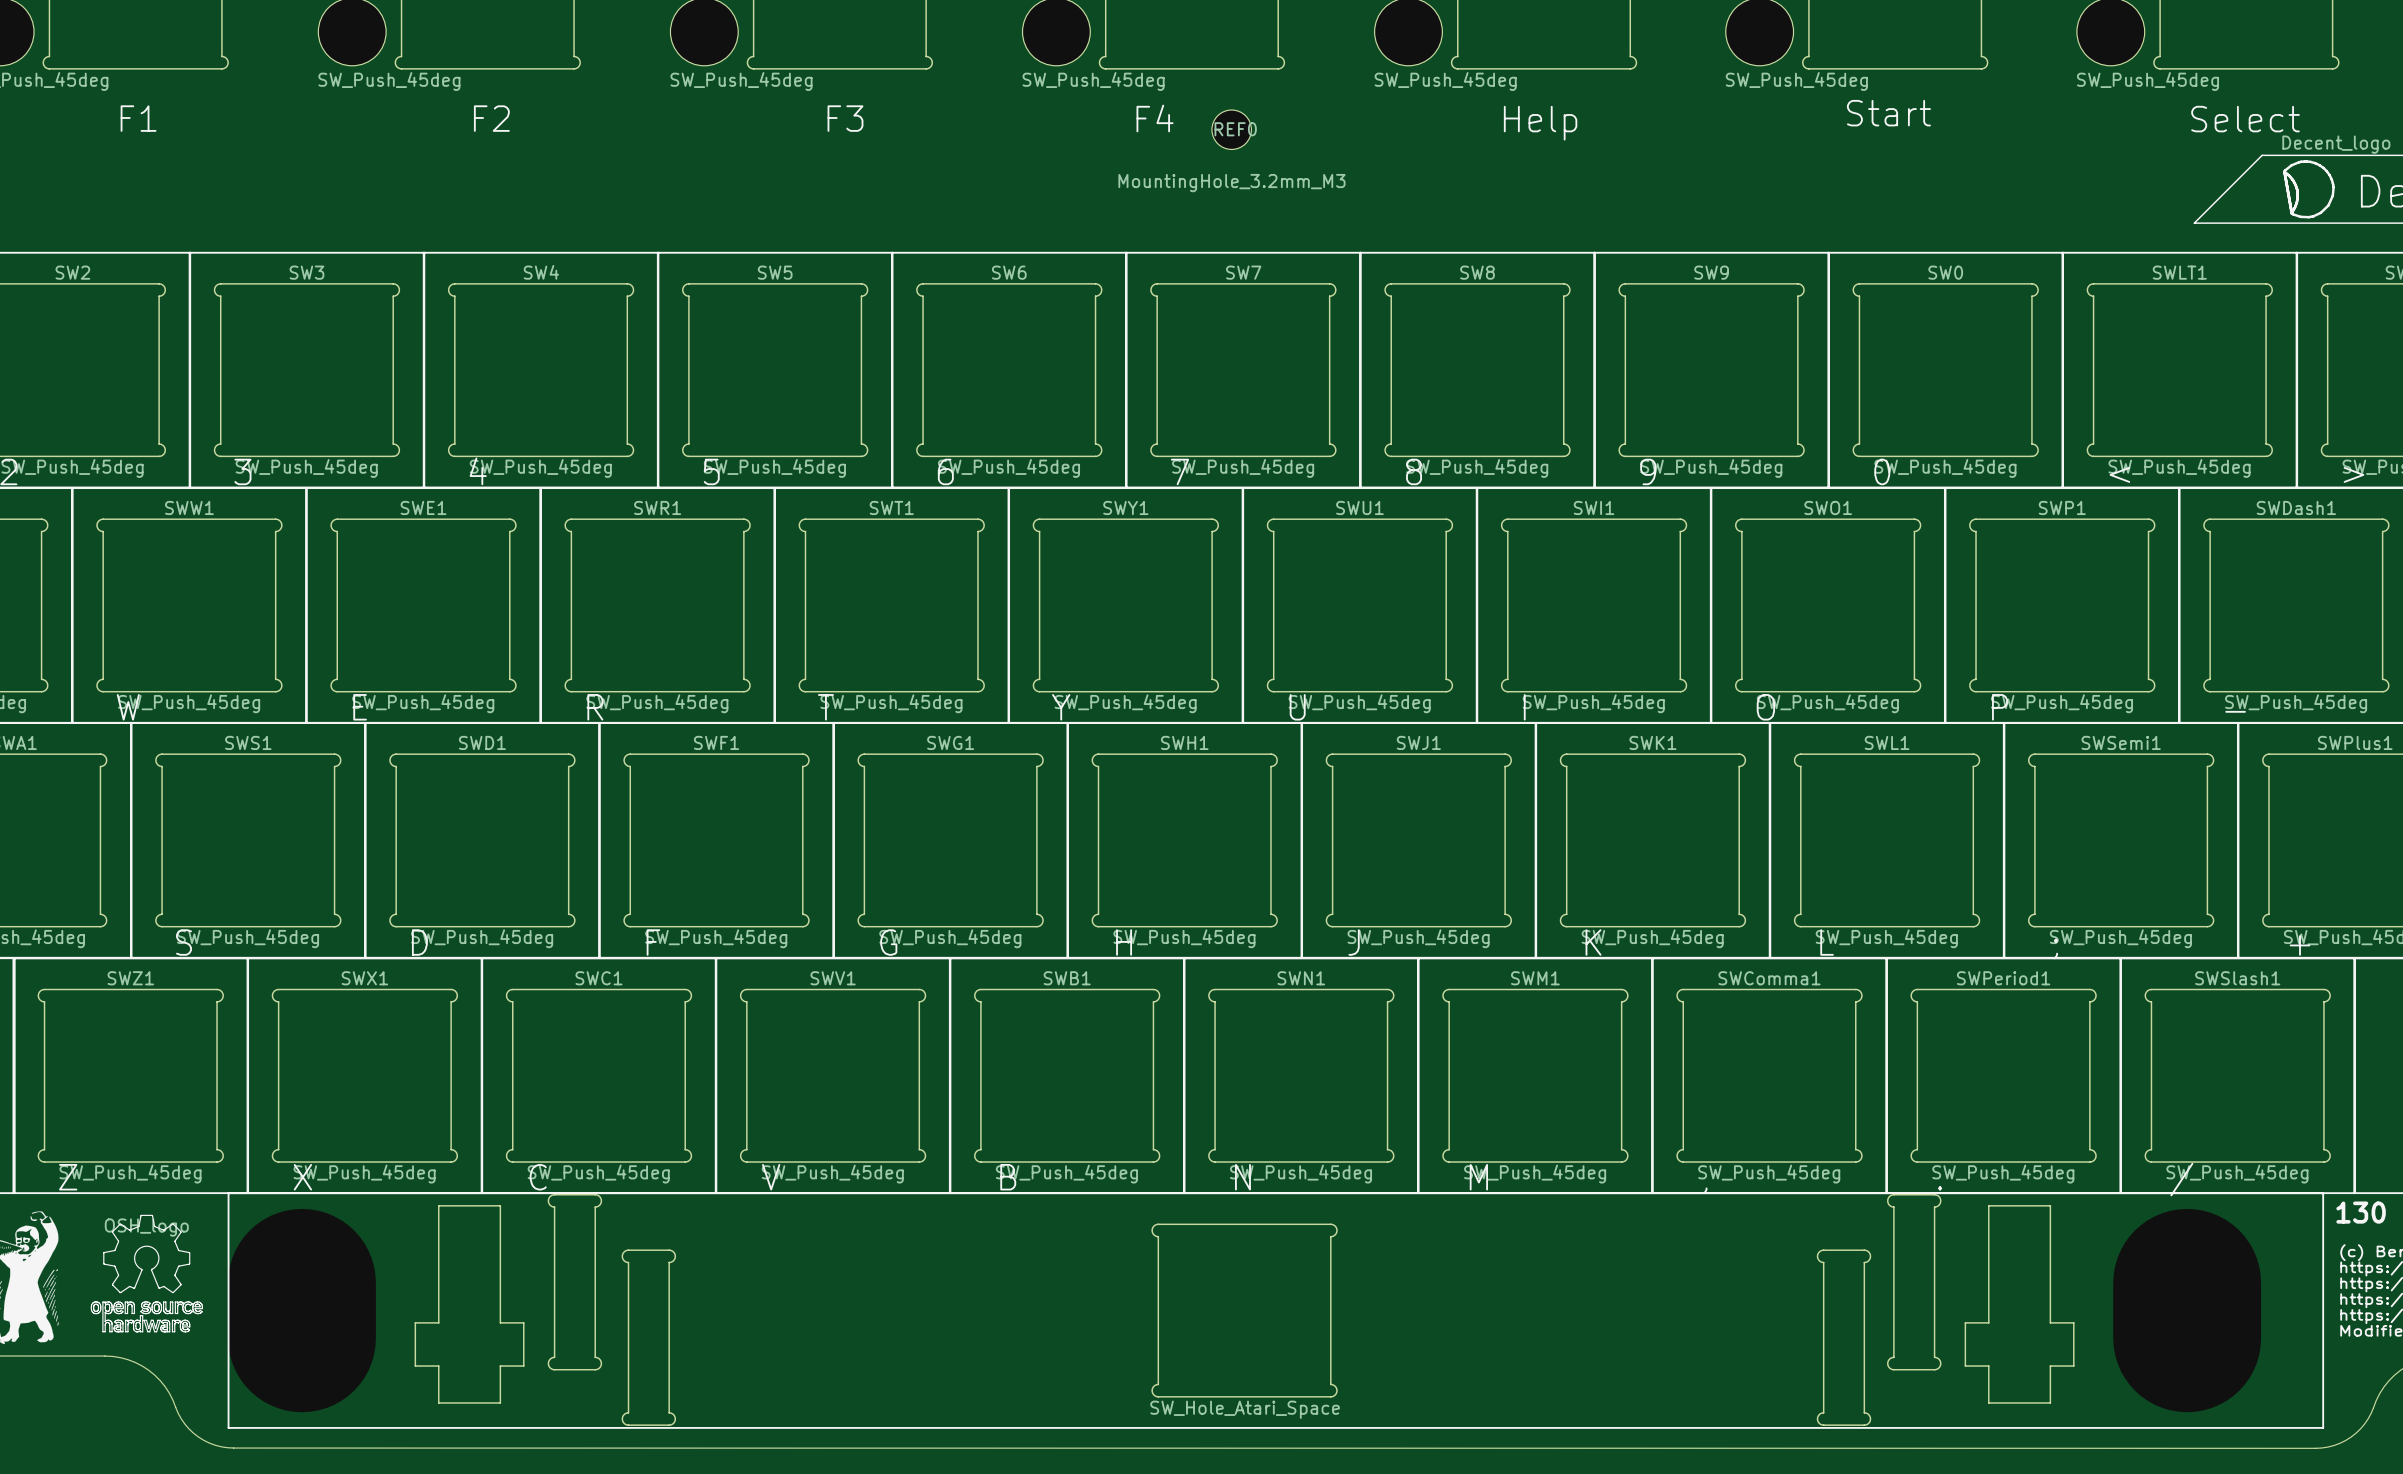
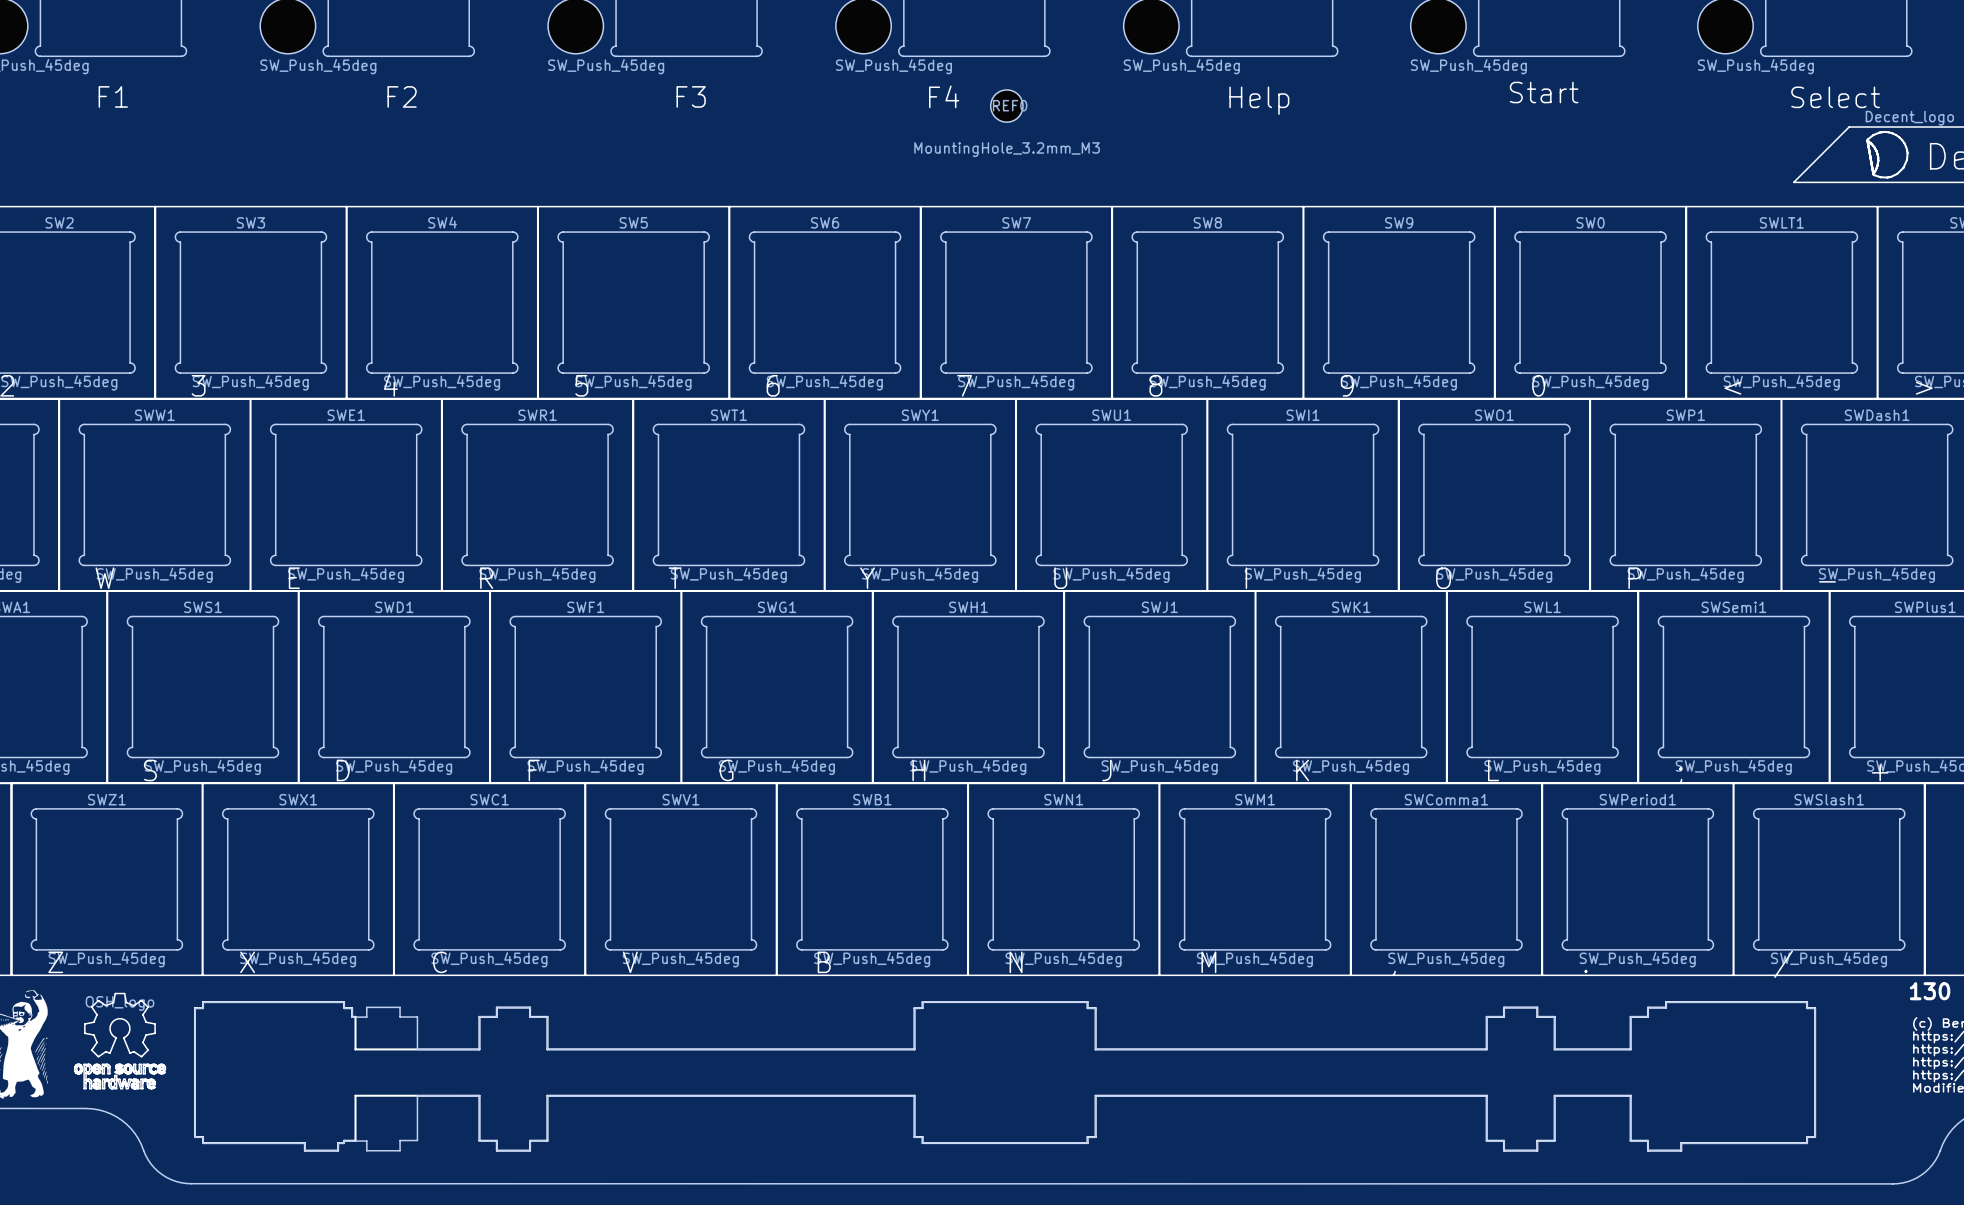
line: none -> (203, 1002) (344, 1002) (344, 1008) (352, 1008) (352, 1016) (355, 1016) (355, 1049) (479, 1049) (479, 1016) (496, 1016) (496, 1007) (530, 1007) (530, 1016) (547, 1016) (547, 1049) (914, 1049) (914, 1008) (922, 1008) (922, 1002) (1087, 1002) (1087, 1008) (1095, 1008) (1095, 1049) (1486, 1049) (1486, 1016) (1504, 1016) (1504, 1007) (1537, 1007) (1537, 1016) (1554, 1016) (1554, 1049) (1630, 1049) (1630, 1016) (1648, 1016) (1648, 1007) (1666, 1007) (1666, 1002) (1807, 1002) (1807, 1008) (1815, 1008) (1815, 1137) (1807, 1137) (1807, 1143) (1681, 1143) (1681, 1150) (1648, 1150) (1648, 1140) (1630, 1140) (1630, 1095) (1554, 1095) (1554, 1140) (1537, 1140) (1537, 1150) (1504, 1150) (1504, 1140) (1486, 1140) (1486, 1095) (1095, 1095) (1095, 1137) (1087, 1137) (1087, 1143) (922, 1143) (922, 1137) (914, 1137) (914, 1095) (547, 1095) (547, 1140) (530, 1140) (530, 1150) (496, 1150) (496, 1140) (479, 1140) (479, 1095) (355, 1095) (355, 1140) (344, 1140) (344, 1143) (338, 1143) (338, 1150) (304, 1150) (304, 1143) (203, 1143) (203, 1137) (194, 1137) (194, 1008) (203, 1008) (203, 1002)
board edge: none -> (366, 1007) (366, 1017) (352, 1017) (352, 1008) (344, 1008) (344, 1002) (203, 1002) (203, 1008) (195, 1008) (195, 1137) (203, 1137) (203, 1143) (304, 1143) (304, 1150) (338, 1150) (338, 1143) (344, 1143) (344, 1141) (366, 1141) (366, 1150) (400, 1150) (400, 1140) (417, 1140) (417, 1095) (479, 1095) (479, 1141) (496, 1141) (496, 1150) (530, 1150) (530, 1140) (547, 1140) (547, 1096) (914, 1096) (914, 1137) (922, 1137) (922, 1142) (1087, 1142) (1087, 1137) (1095, 1137) (1095, 1096) (1486, 1096) (1486, 1141) (1504, 1141) (1504, 1150) (1537, 1150) (1537, 1141) (1554, 1141) (1554, 1096) (1630, 1096) (1630, 1141) (1648, 1141) (1648, 1150) (1681, 1150) (1681, 1143) (1807, 1143) (1807, 1136) (1815, 1136) (1815, 1008) (1807, 1008) (1807, 1002) (1666, 1002) (1666, 1007) (1648, 1007) (1648, 1016) (1630, 1016) (1630, 1049) (1554, 1049) (1554, 1016) (1537, 1016) (1537, 1007) (1504, 1007) (1504, 1016) (1486, 1016) (1486, 1049) (1095, 1049) (1095, 1008) (1087, 1008) (1087, 1001) (922, 1001) (922, 1008) (914, 1008) (914, 1049) (547, 1049) (547, 1017) (530, 1017)
board edge: none -> (366, 1007) (400, 1007) (400, 1017) (417, 1017) (417, 1049) (479, 1049) (479, 1016) (496, 1016) (496, 1007) (530, 1007) (530, 1017)
part: SW_Hole_Atari_Space (1275, 1310) -> none

